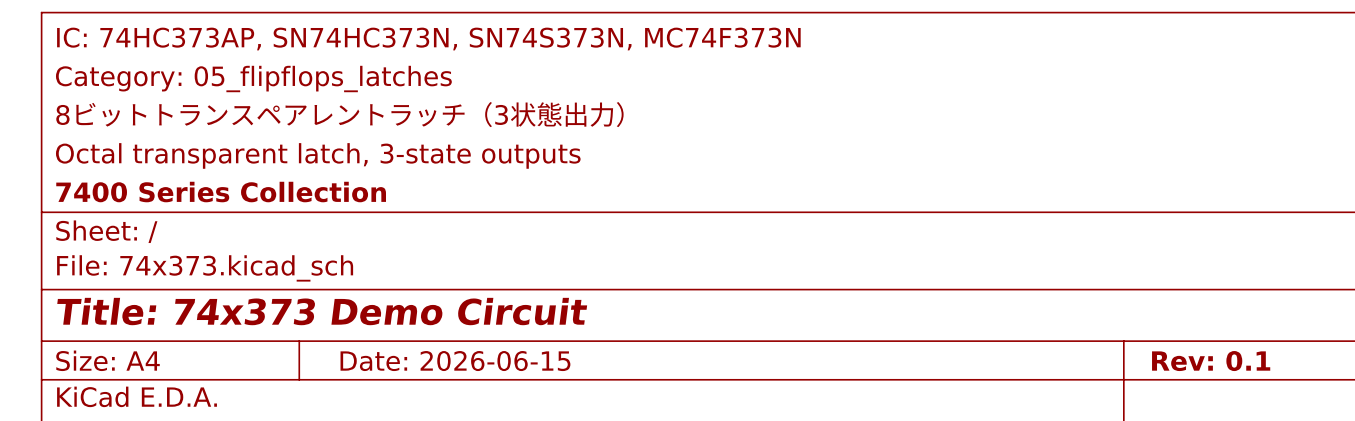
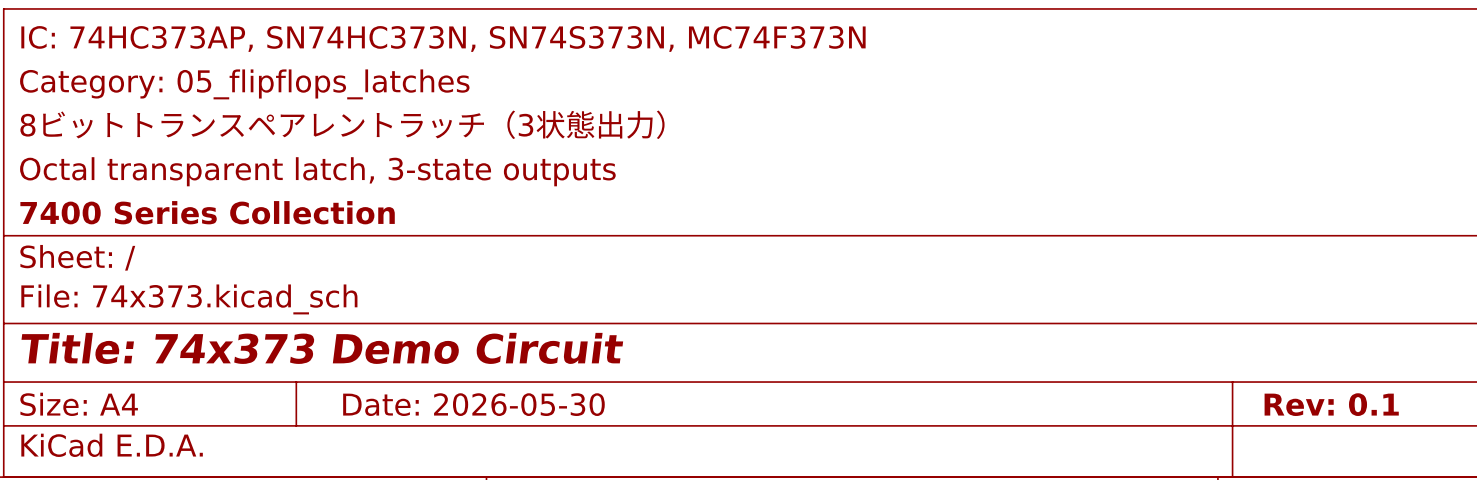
title block: Date: 2026-06-15 (455, 361) -> Date: 2026-05-30 (473, 404)

